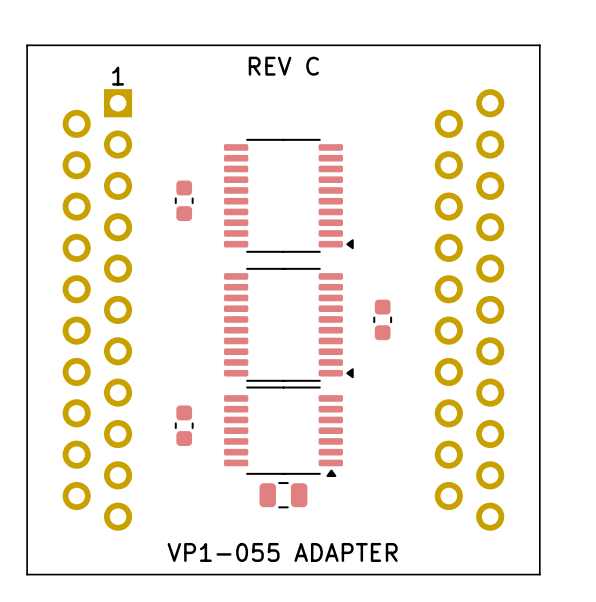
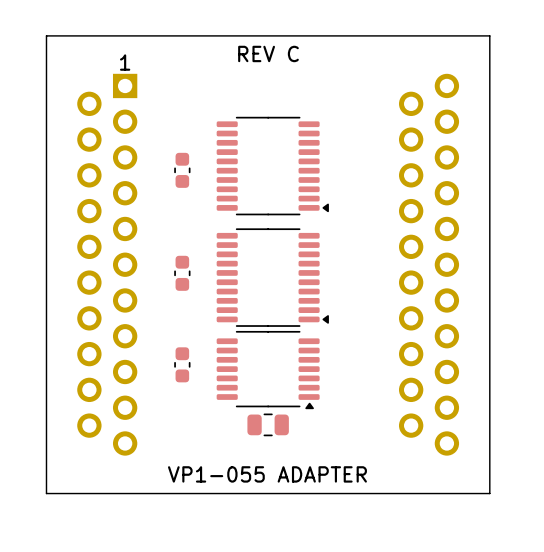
part position: (382, 319) -> (182, 273)

